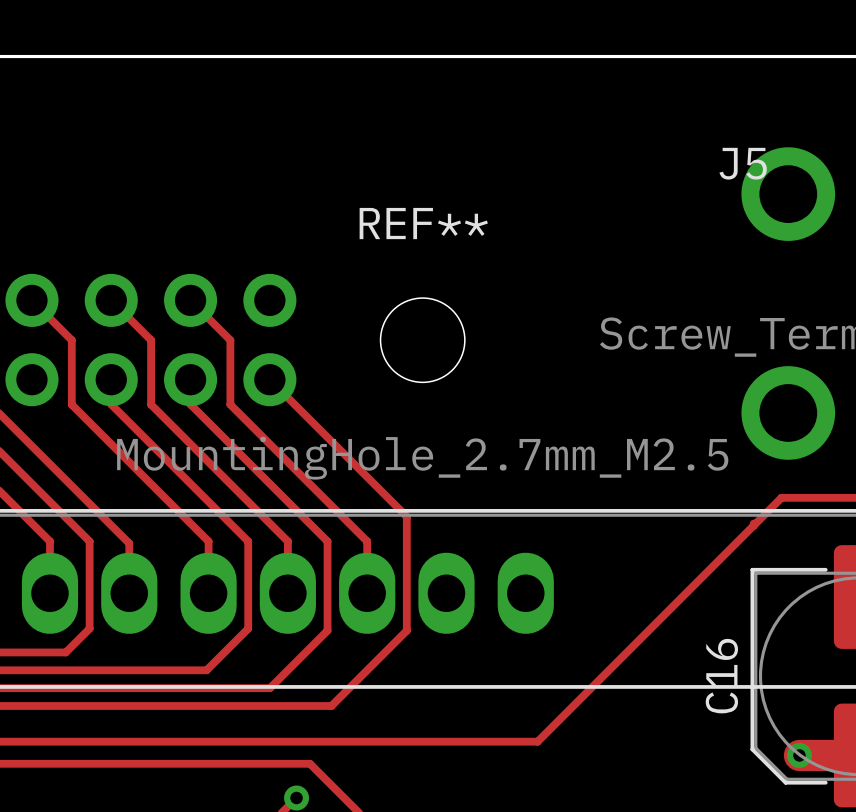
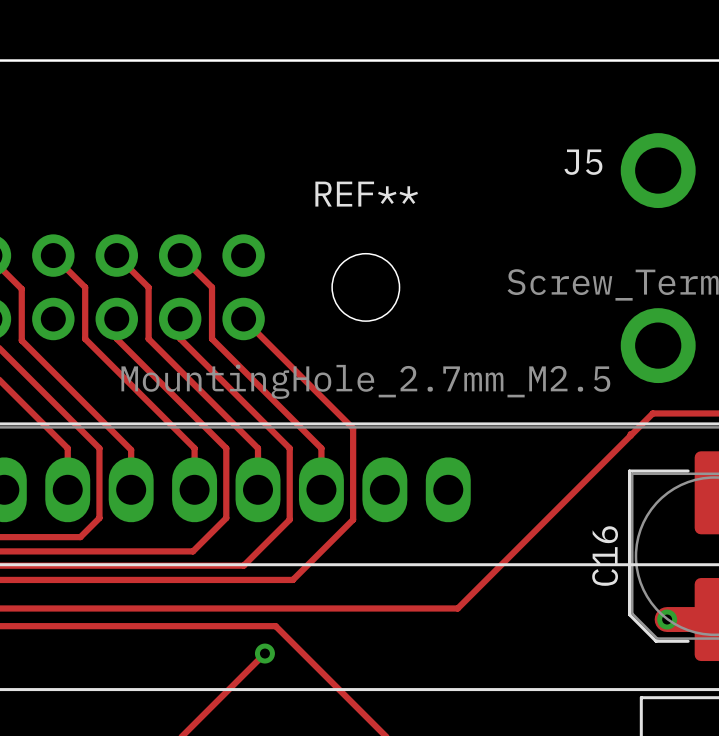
J5 name position: J5 (743, 163) -> J5 (583, 162)

